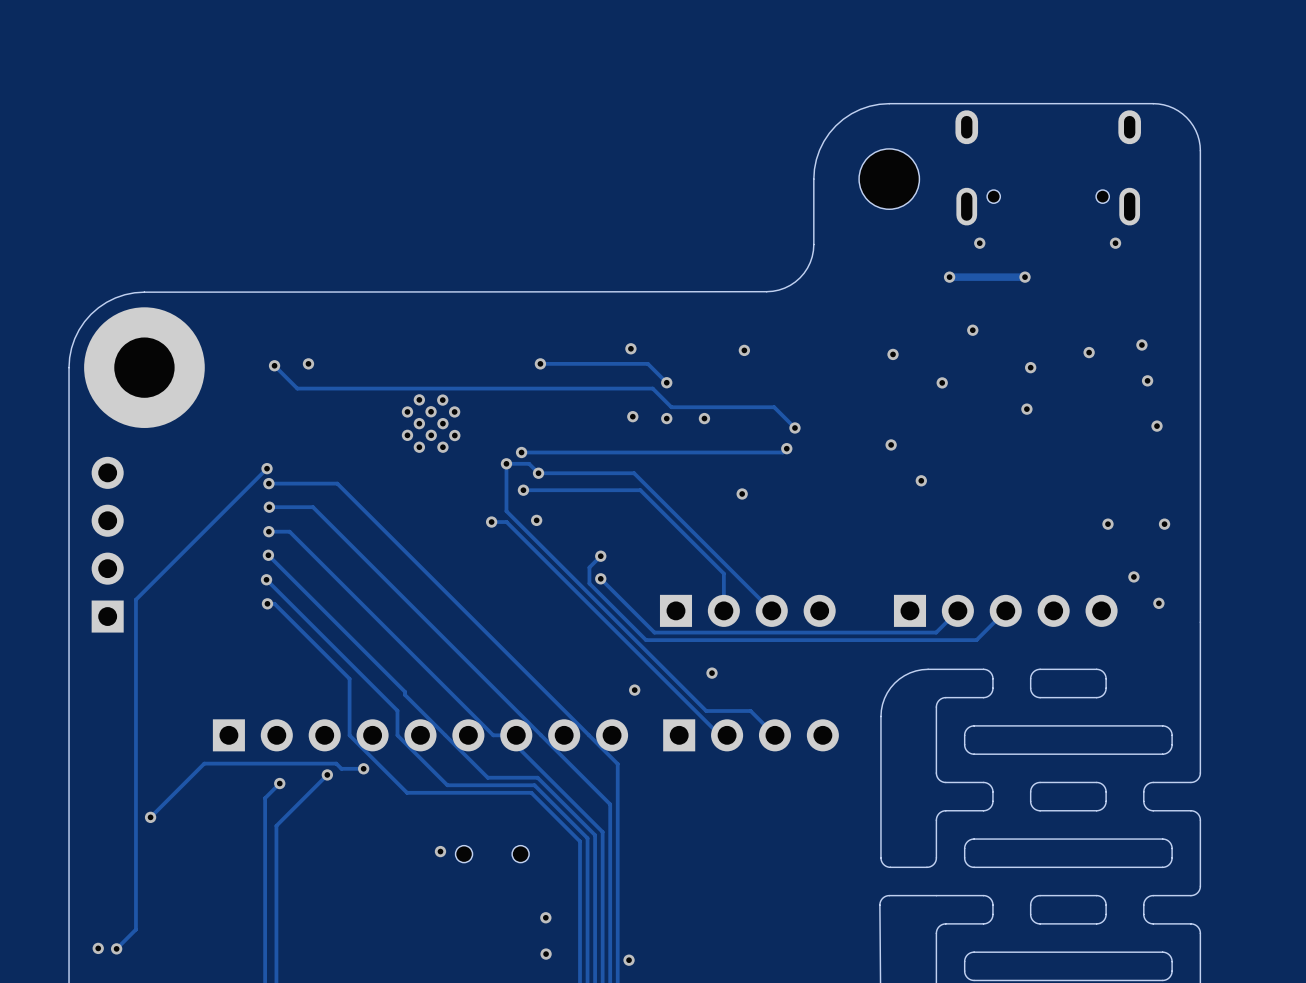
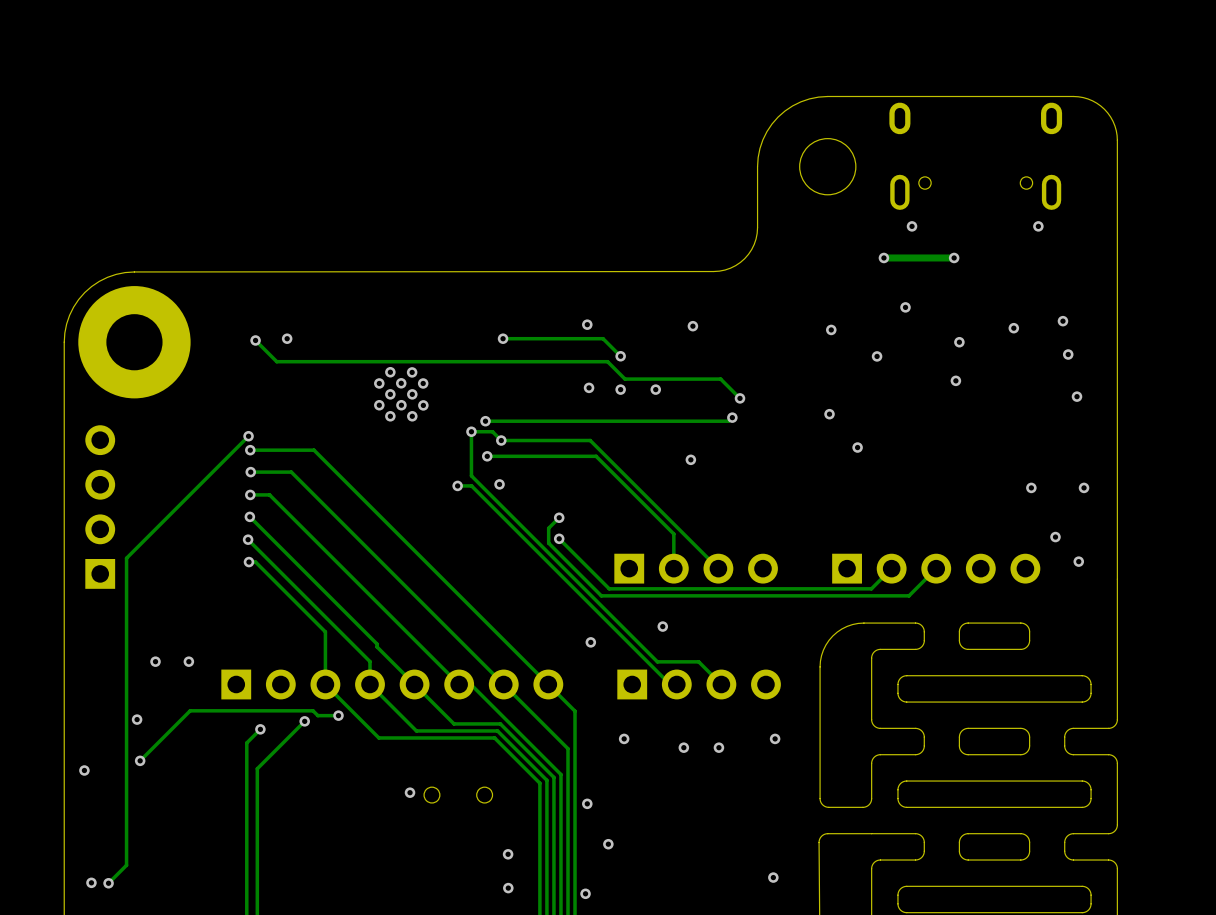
via: none -> (155, 661)
via: none -> (188, 661)
part footprint: [212, 719, 629, 752] -> [221, 669, 564, 700]
via: none -> (137, 719)
via: none -> (624, 738)
via: none -> (775, 738)
via: none -> (683, 747)
via: none -> (718, 747)
via: none -> (84, 770)
via: none -> (587, 803)
via: none -> (608, 844)
via: none -> (773, 877)

